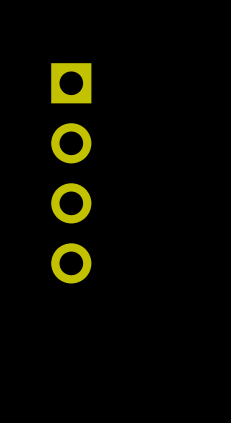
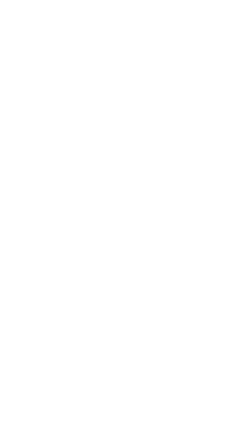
part: (71, 173) -> none

